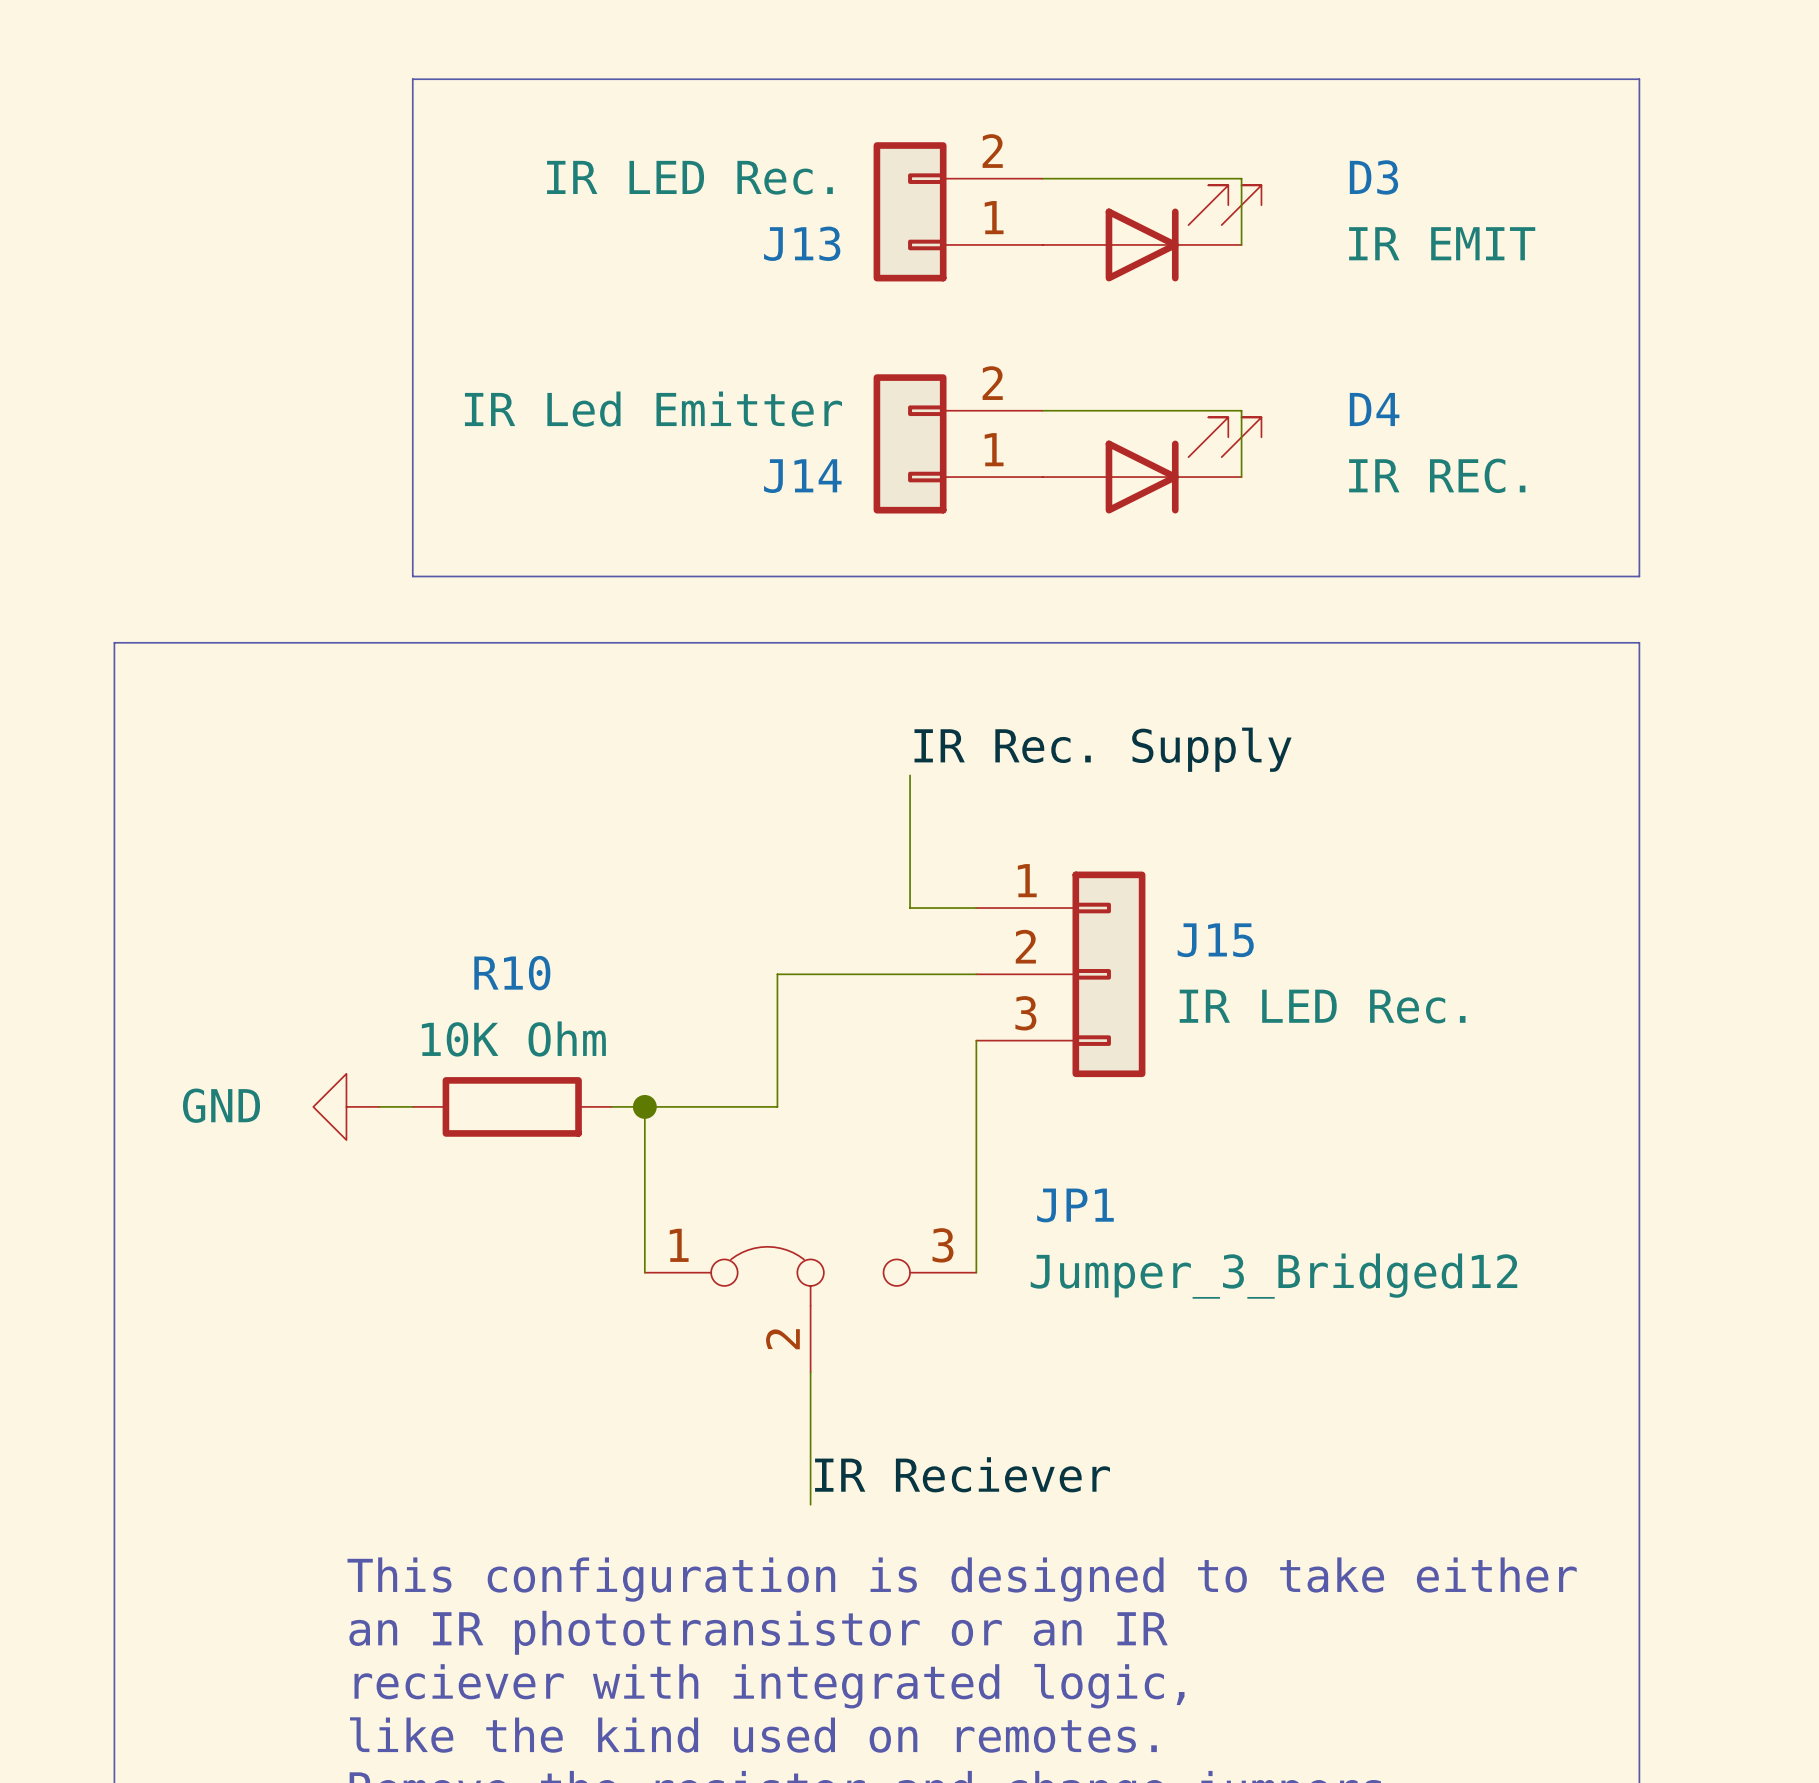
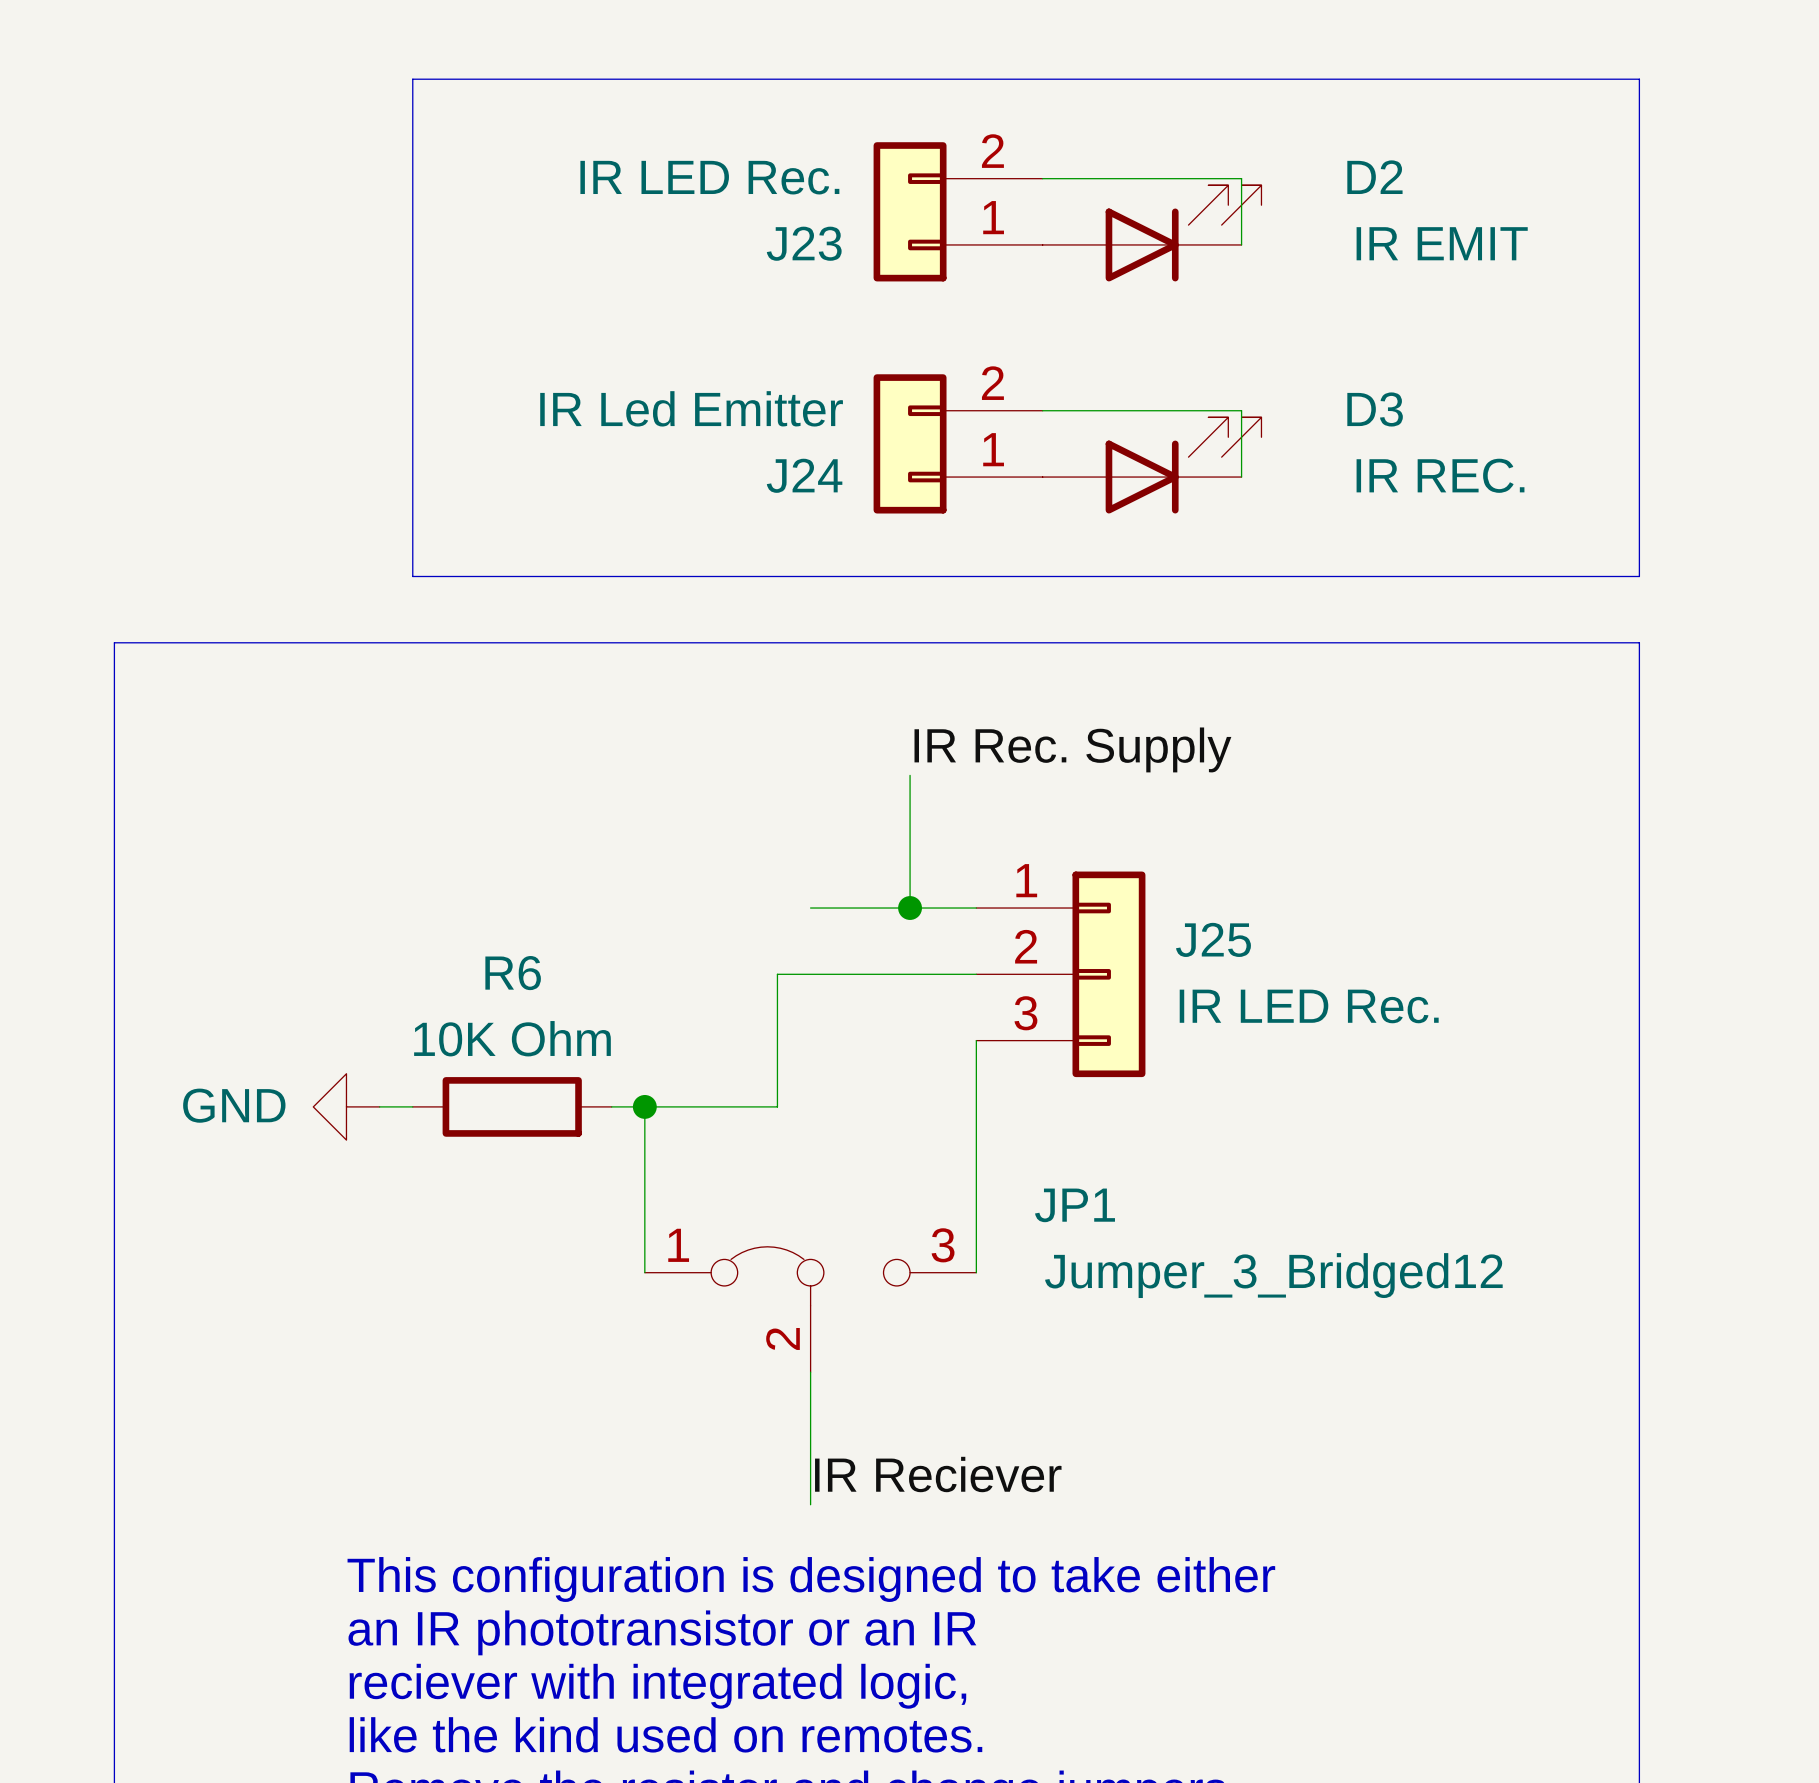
D3 name: D3 (1373, 177) -> D2 (1374, 177)
J13 name: J13 (802, 243) -> J23 (804, 243)
D4 name: D4 (1374, 409) -> D3 (1375, 409)
J14 name: J14 (802, 476) -> J24 (804, 475)
wire: none -> (810, 908) (910, 908)
junction: none -> (910, 908)
J15 name: J15 (1215, 940) -> J25 (1213, 939)
R10 name: R10 (512, 973) -> R6 (513, 973)

